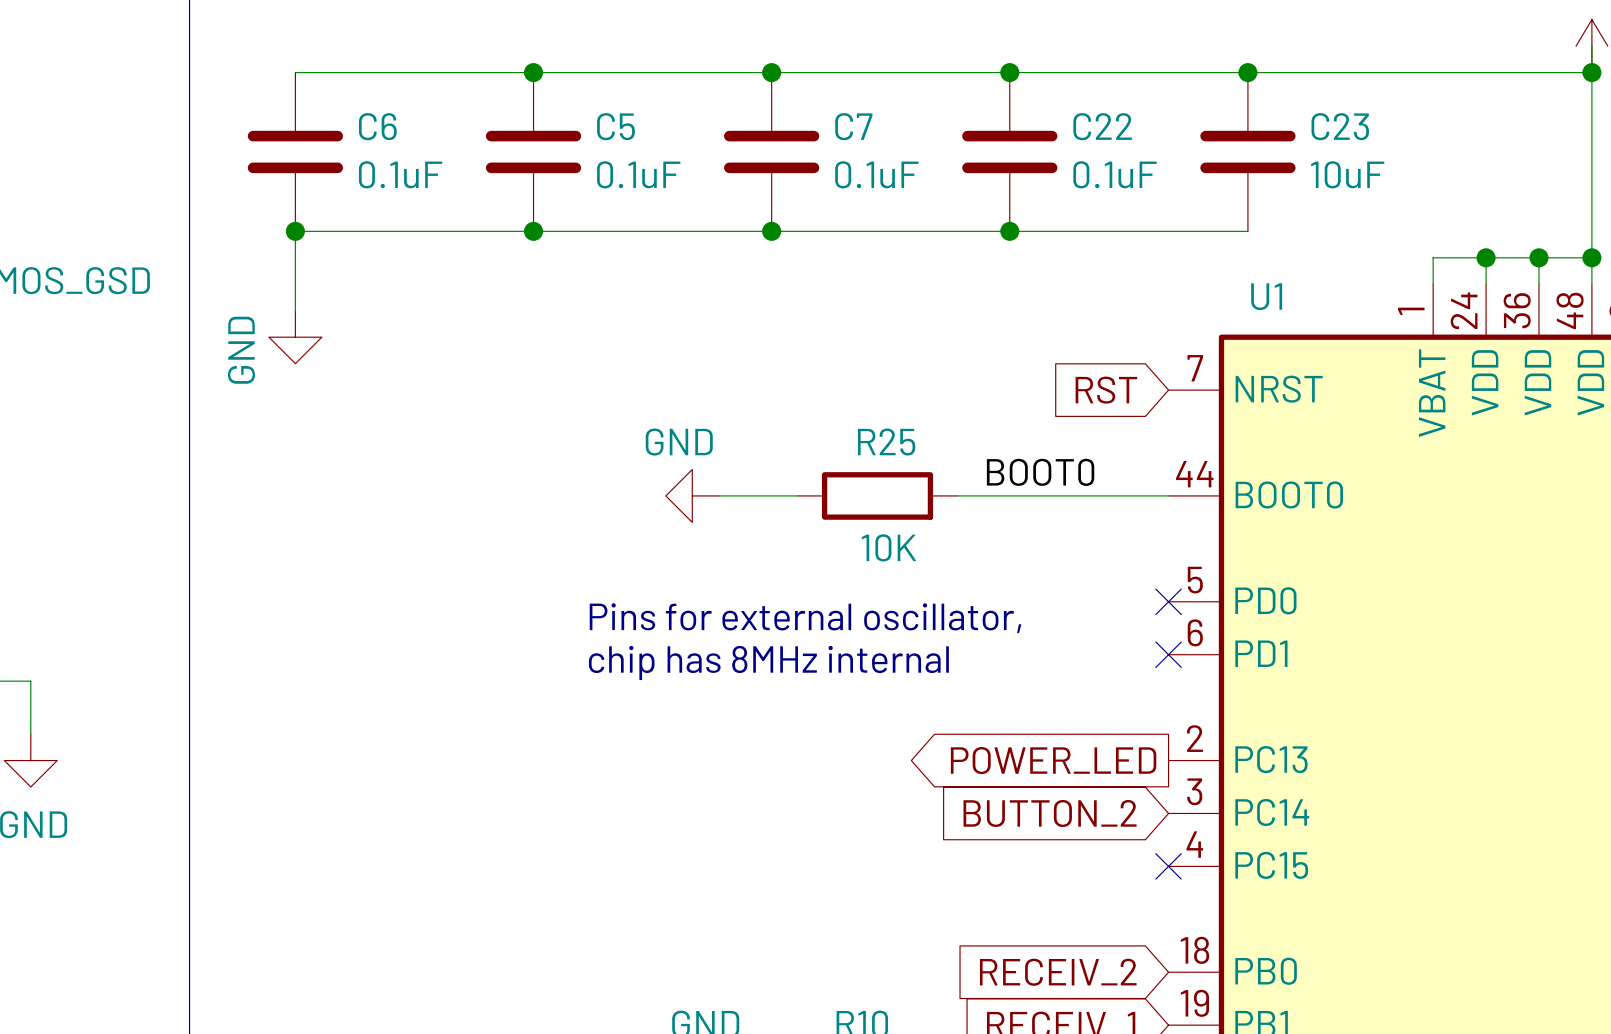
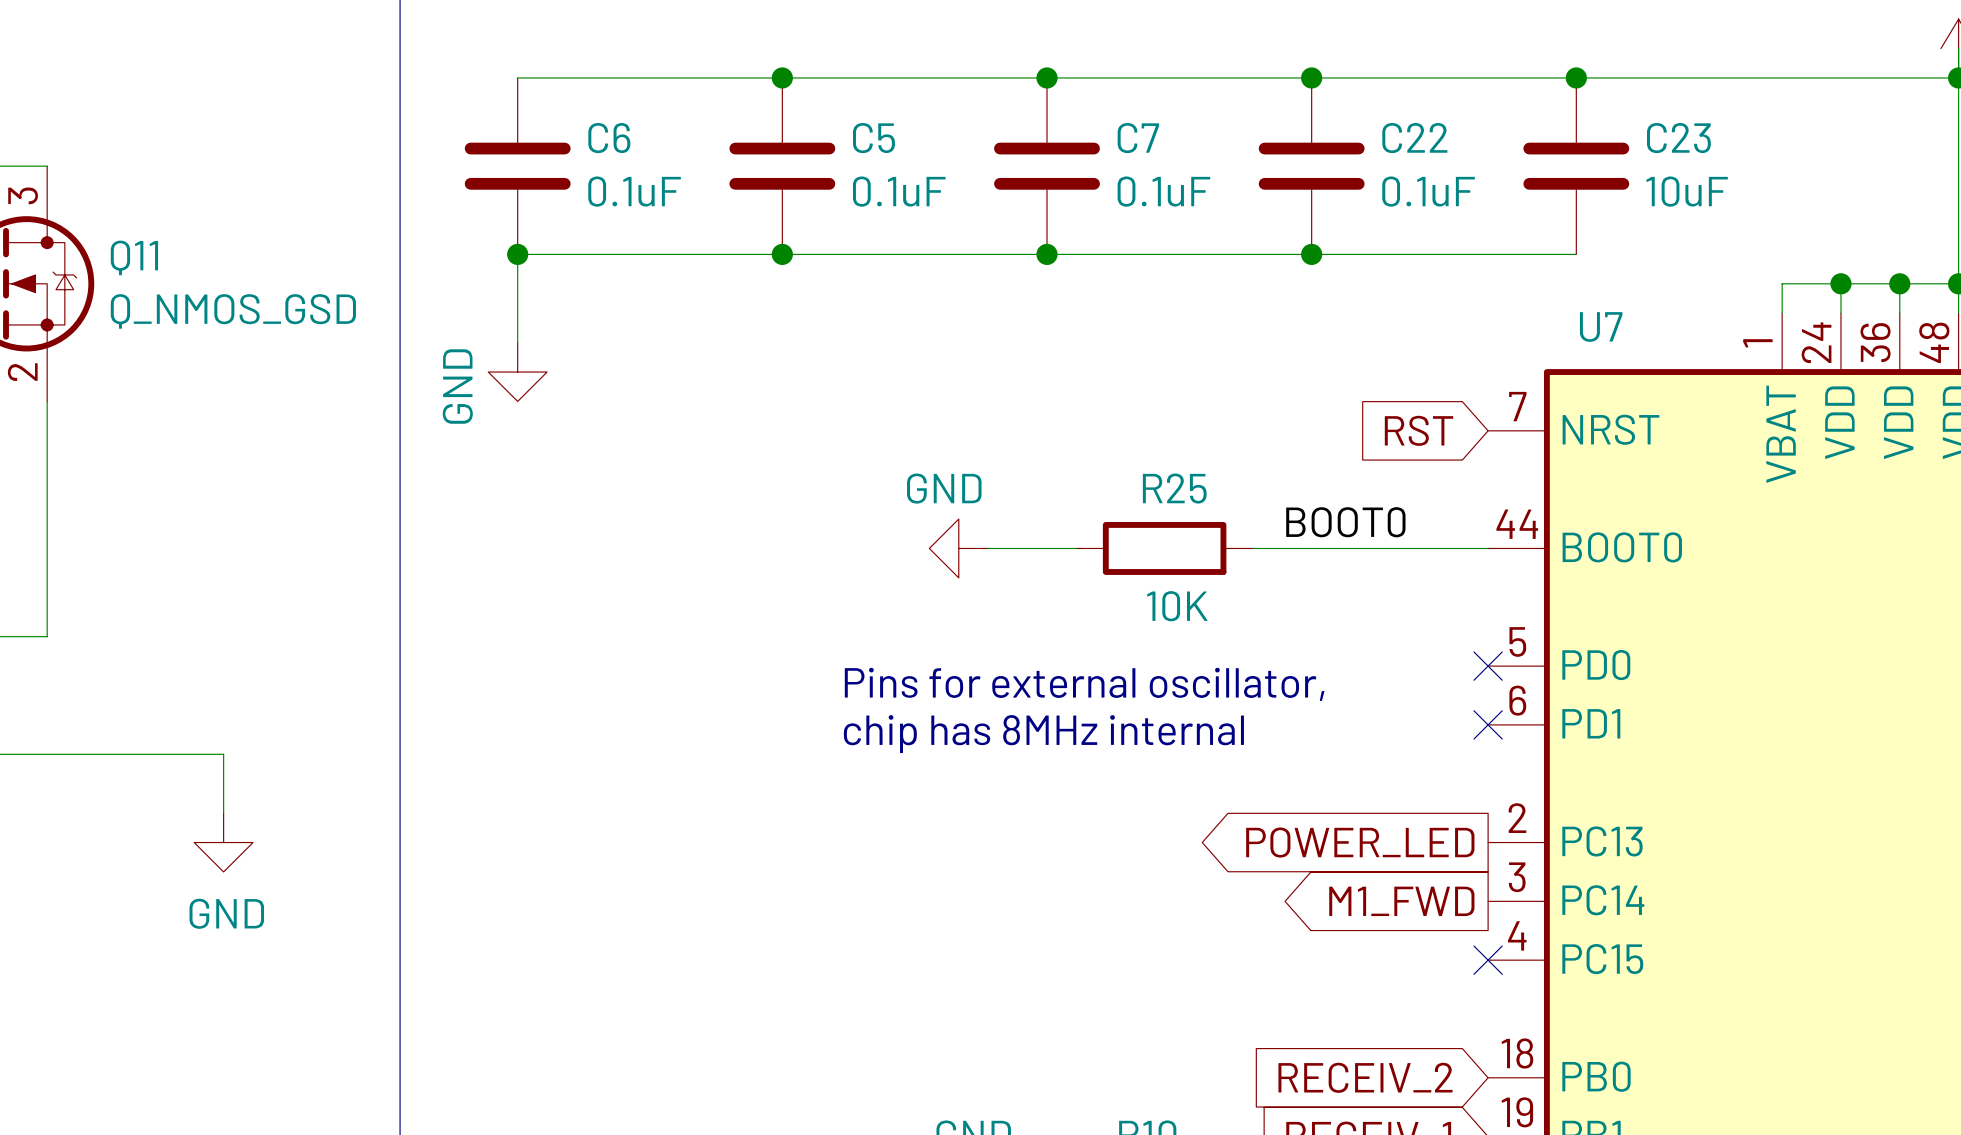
U1 name: U1 (1266, 296) -> U7 (1601, 326)
global label shape: input (1050, 813) -> output (1401, 901)
global label: BUTTON_2 (1050, 813) -> M1_FWD (1401, 901)

